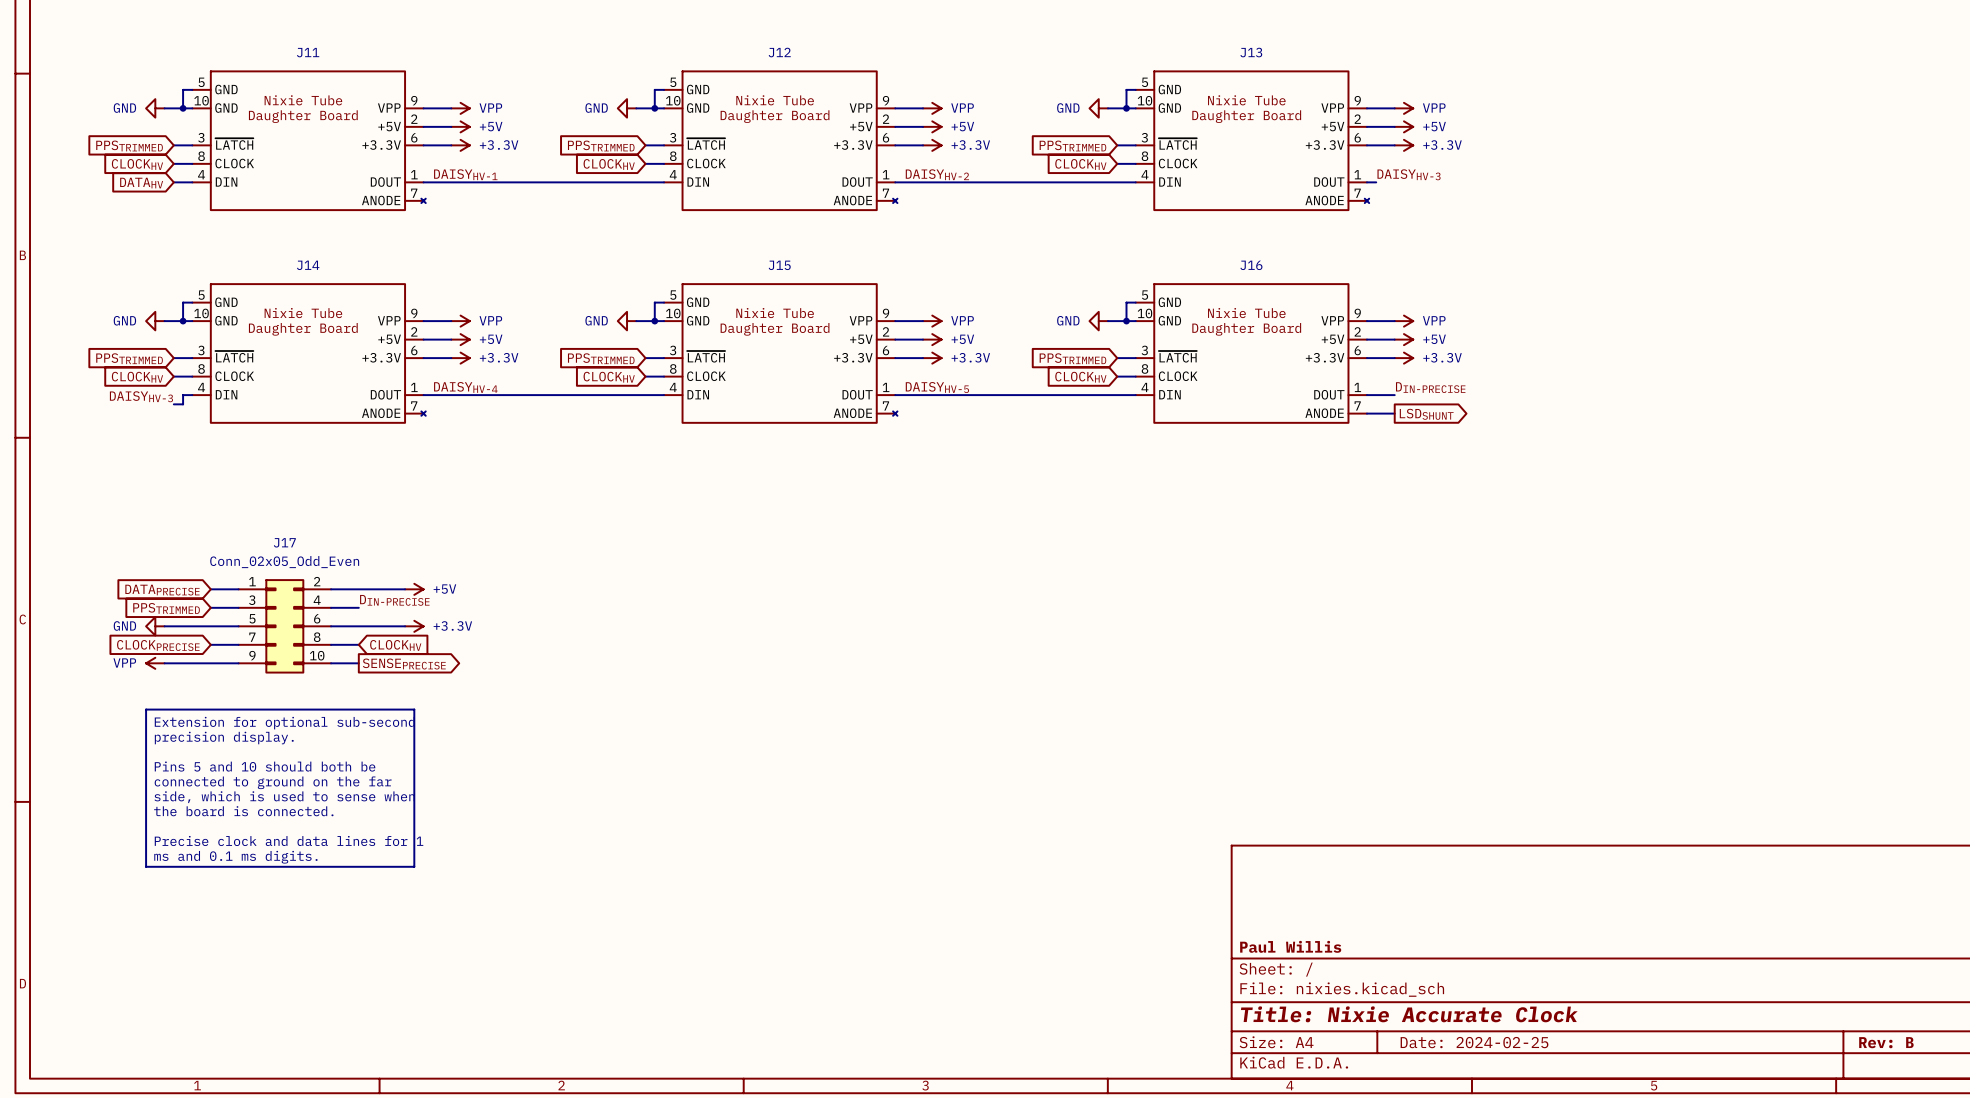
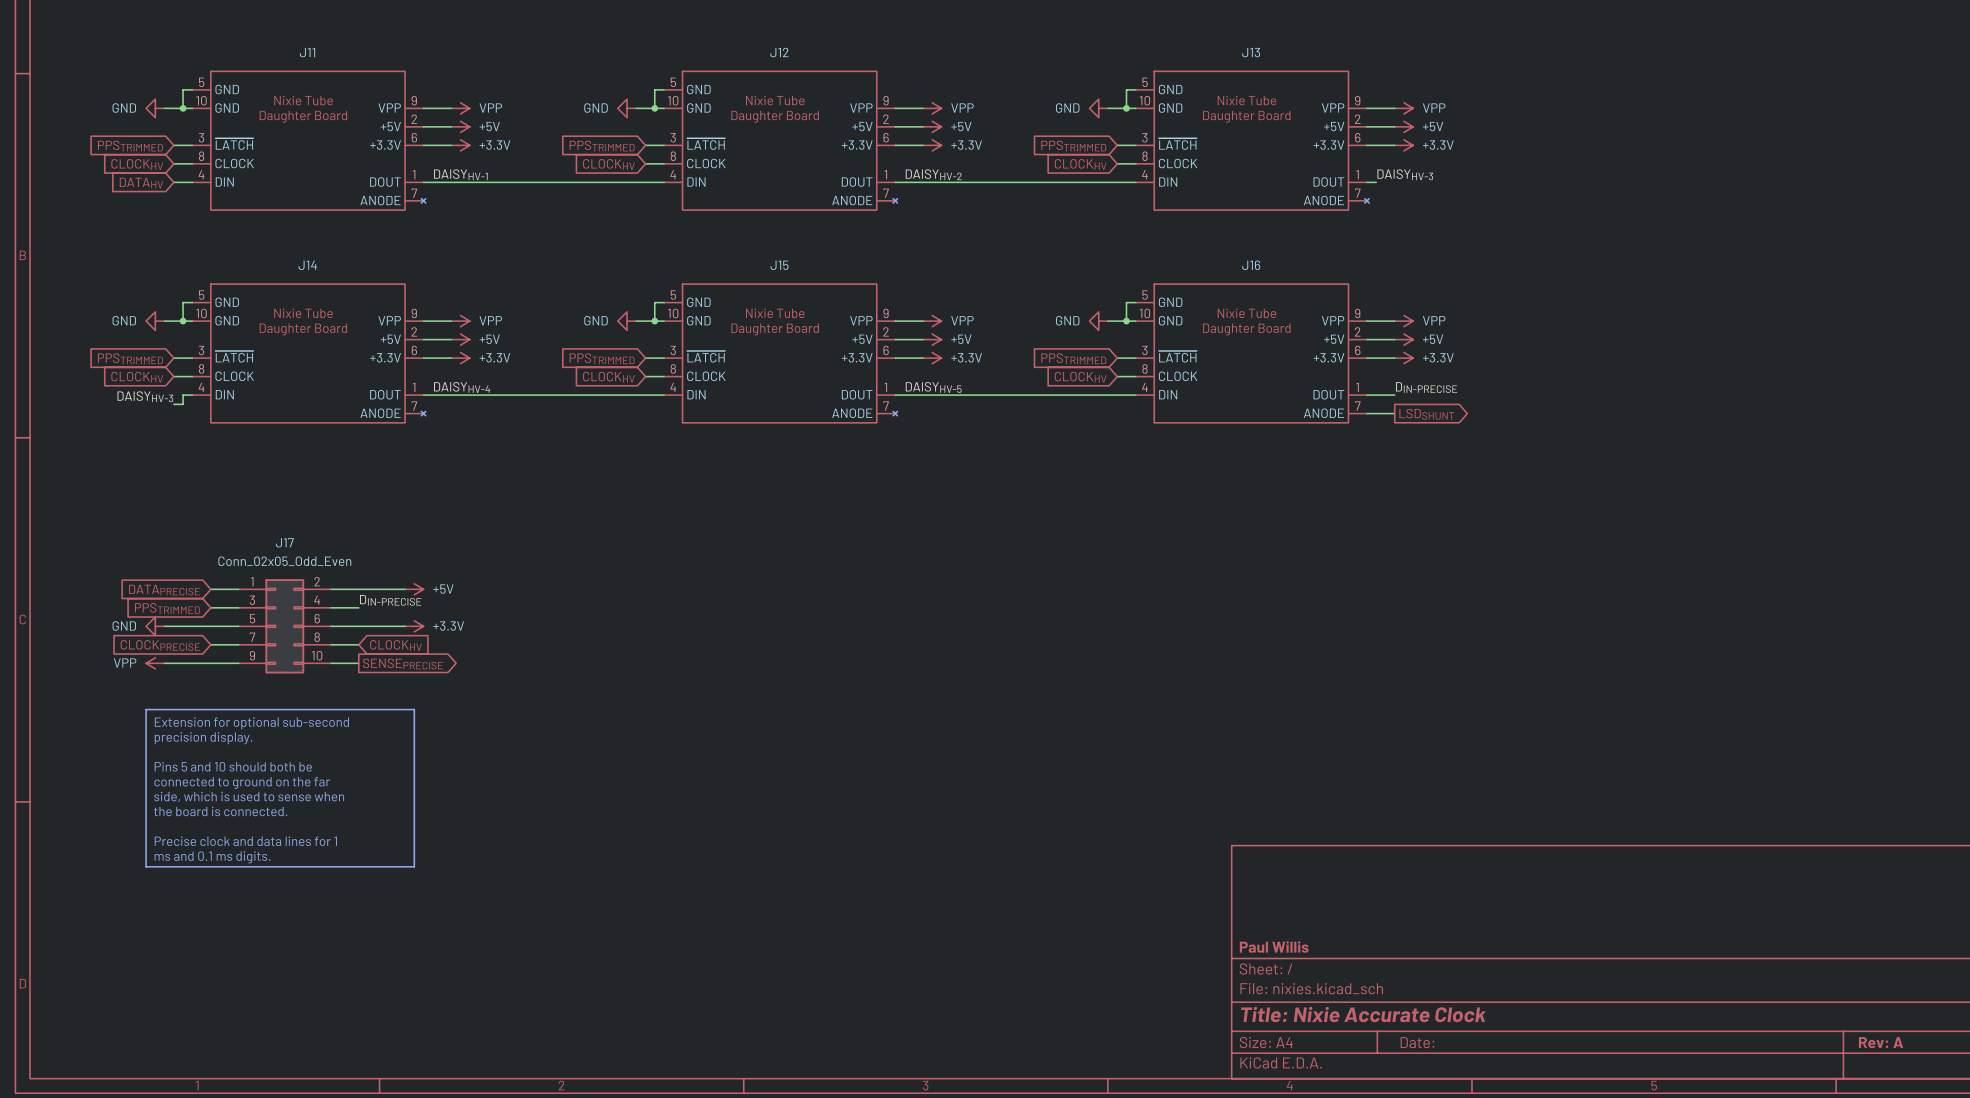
title block: Date: 2024-02-25 (1474, 1042) -> Date: (1417, 1042)
title block: Rev: B (1886, 1042) -> Rev: A (1880, 1042)

